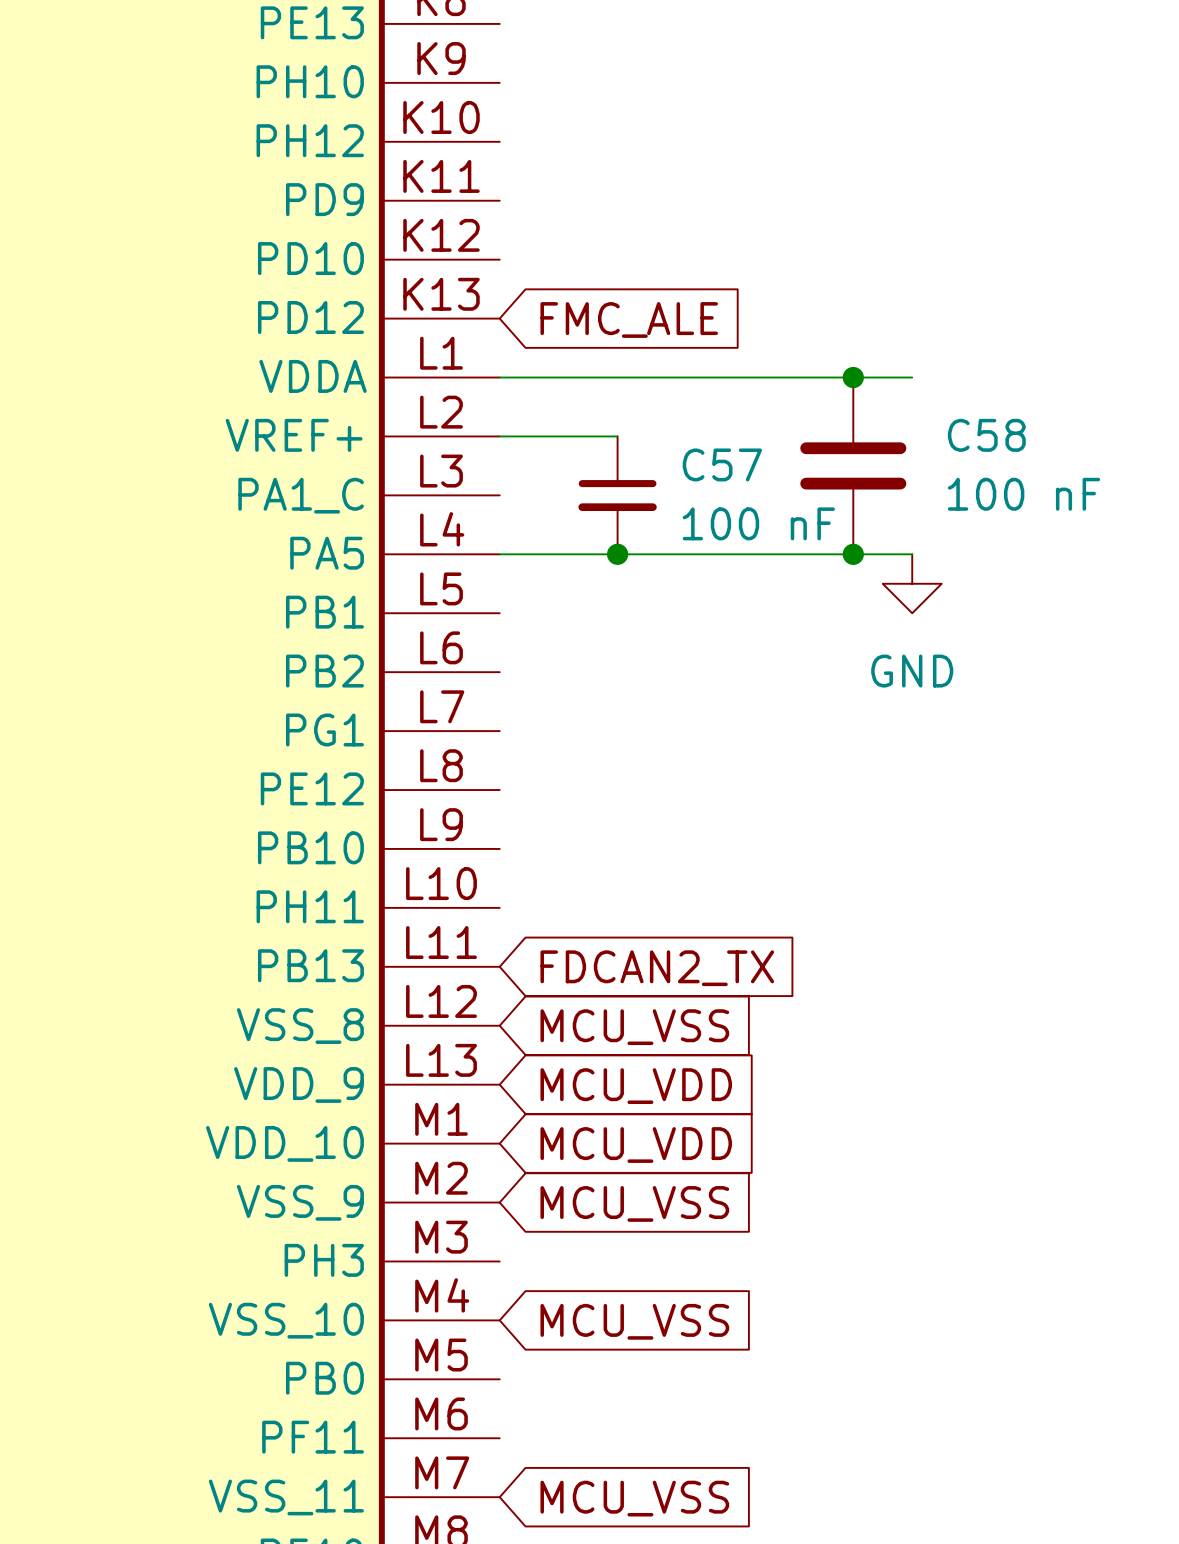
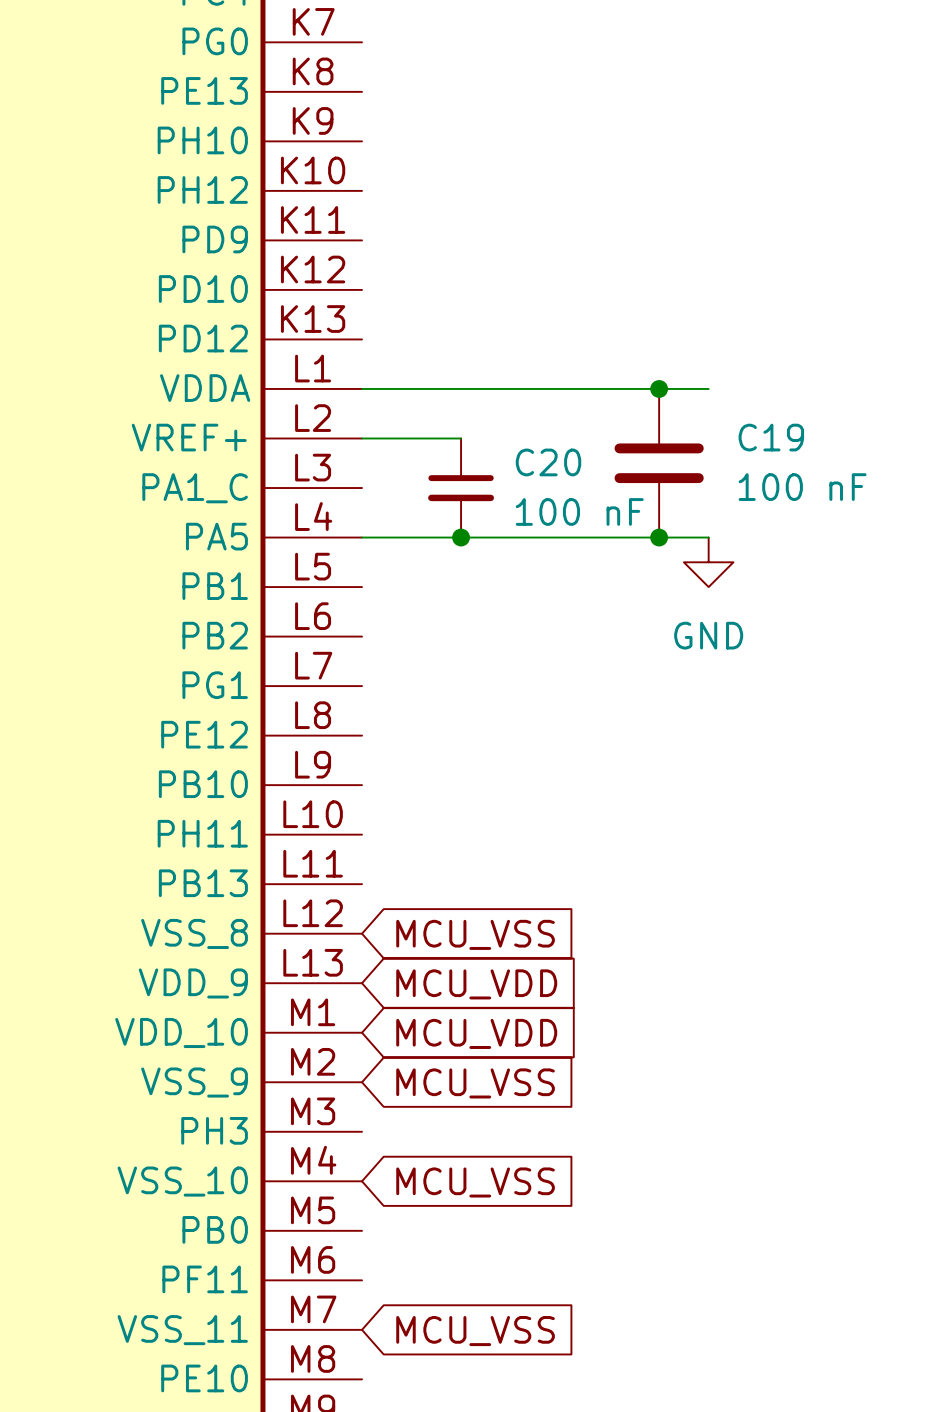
global label: FMC_ALE (629, 319) -> none
C58 name: C58 (986, 435) -> C19 (771, 437)
C57 name: C57 (722, 464) -> C20 (548, 462)
global label: FDCAN2_TX (657, 968) -> none

